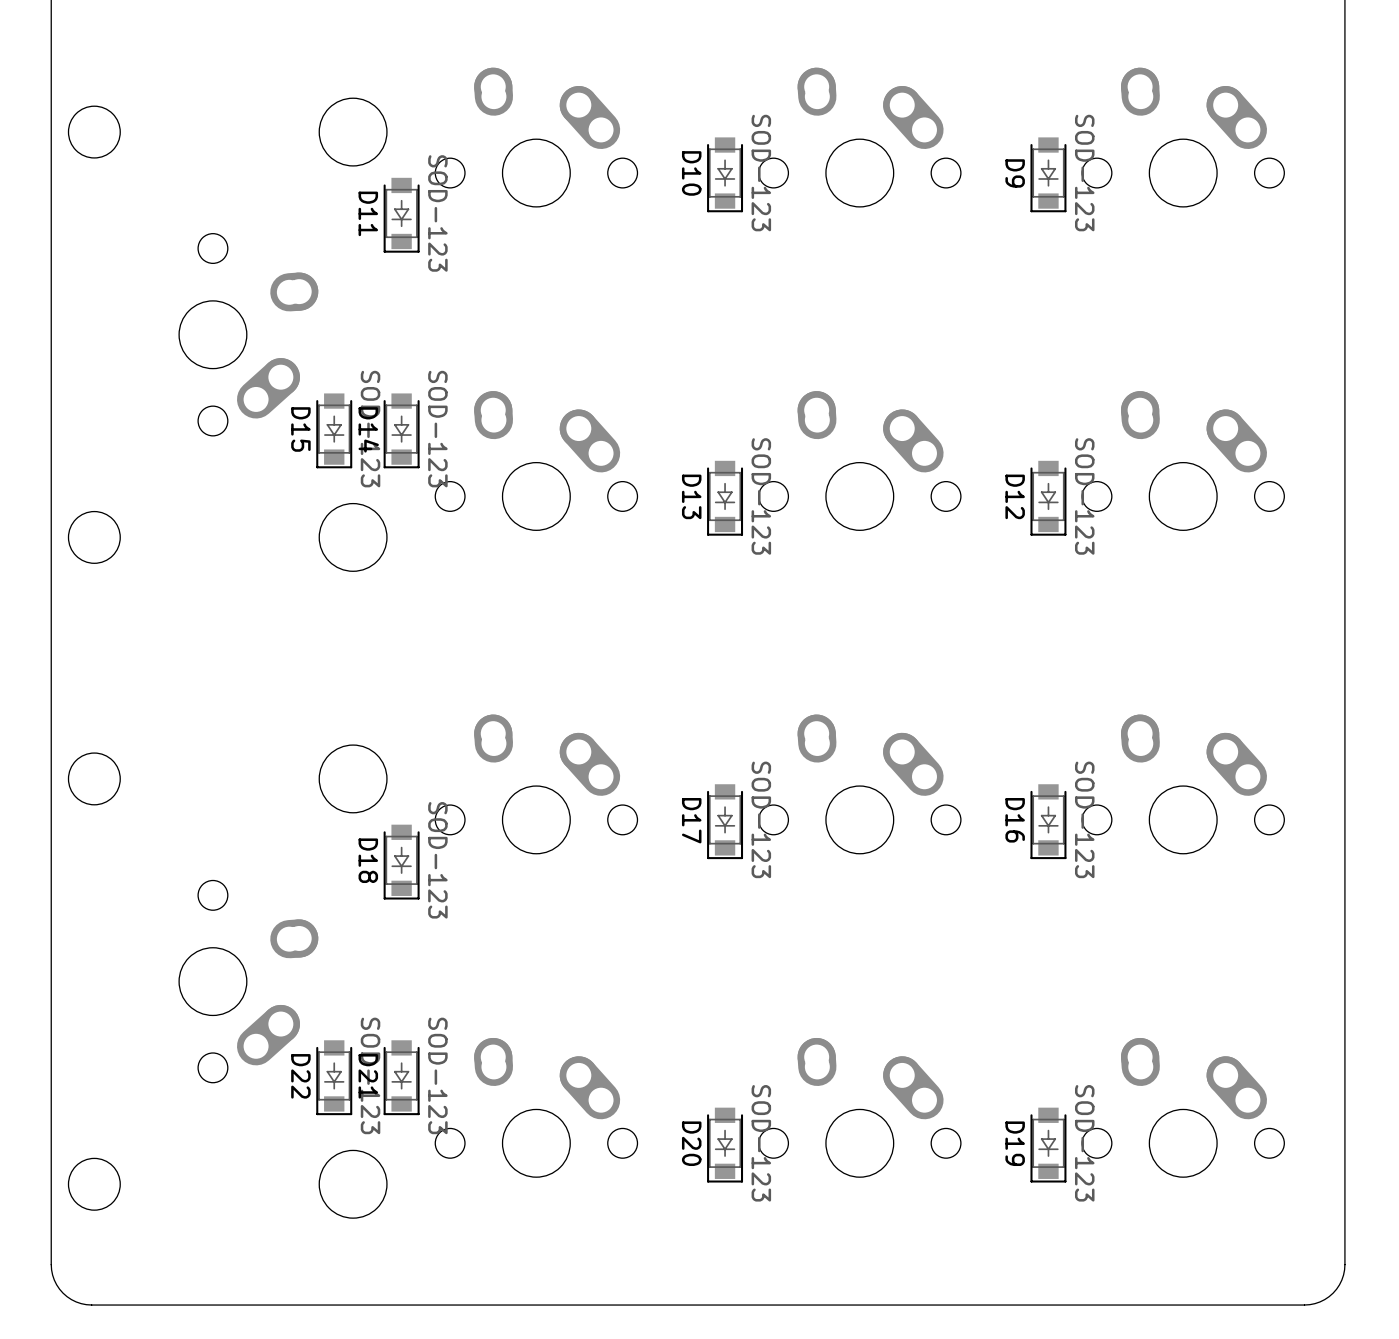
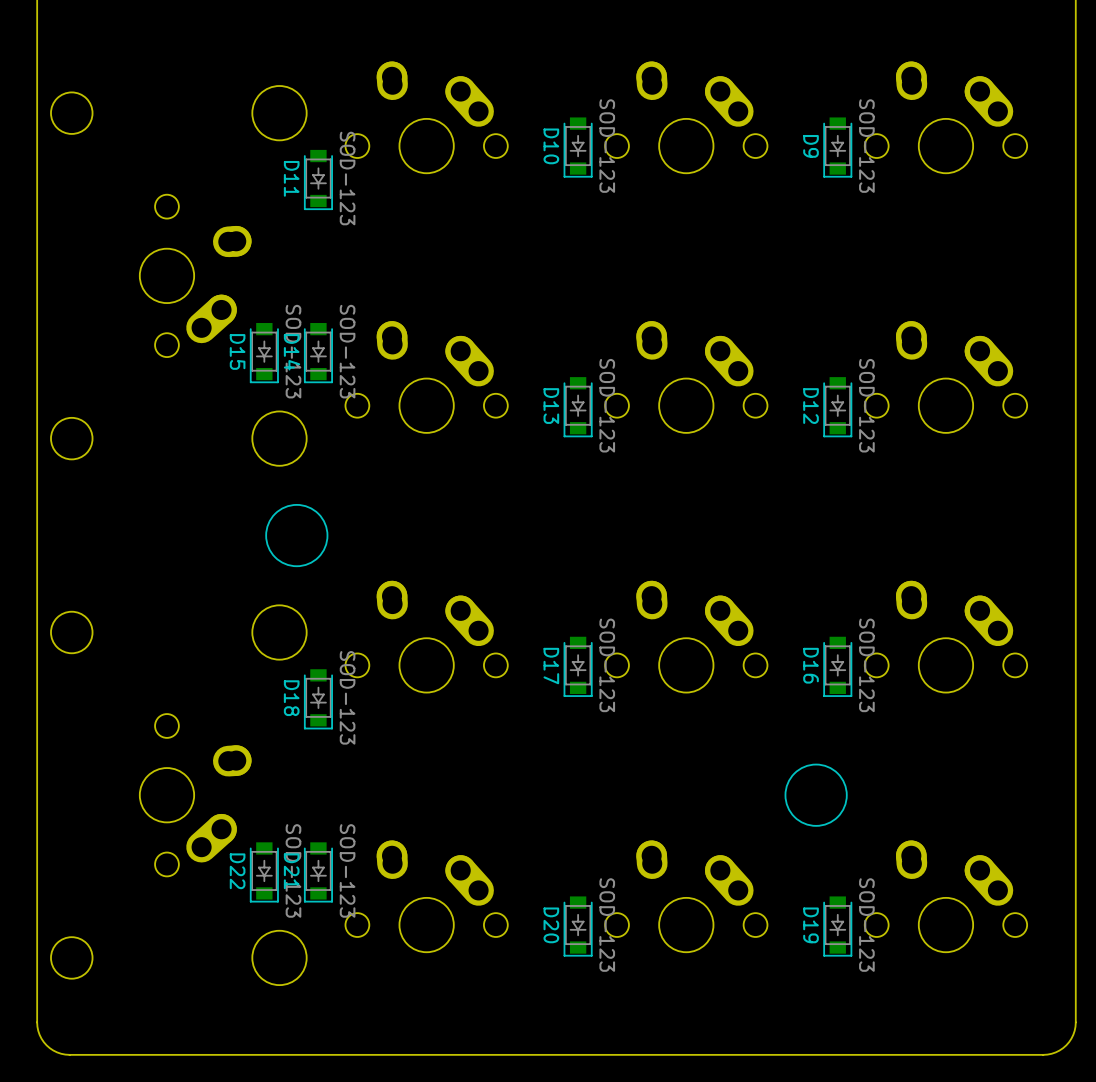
drawing: none -> [265, 504, 329, 568]
drawing: none -> [784, 763, 848, 827]

